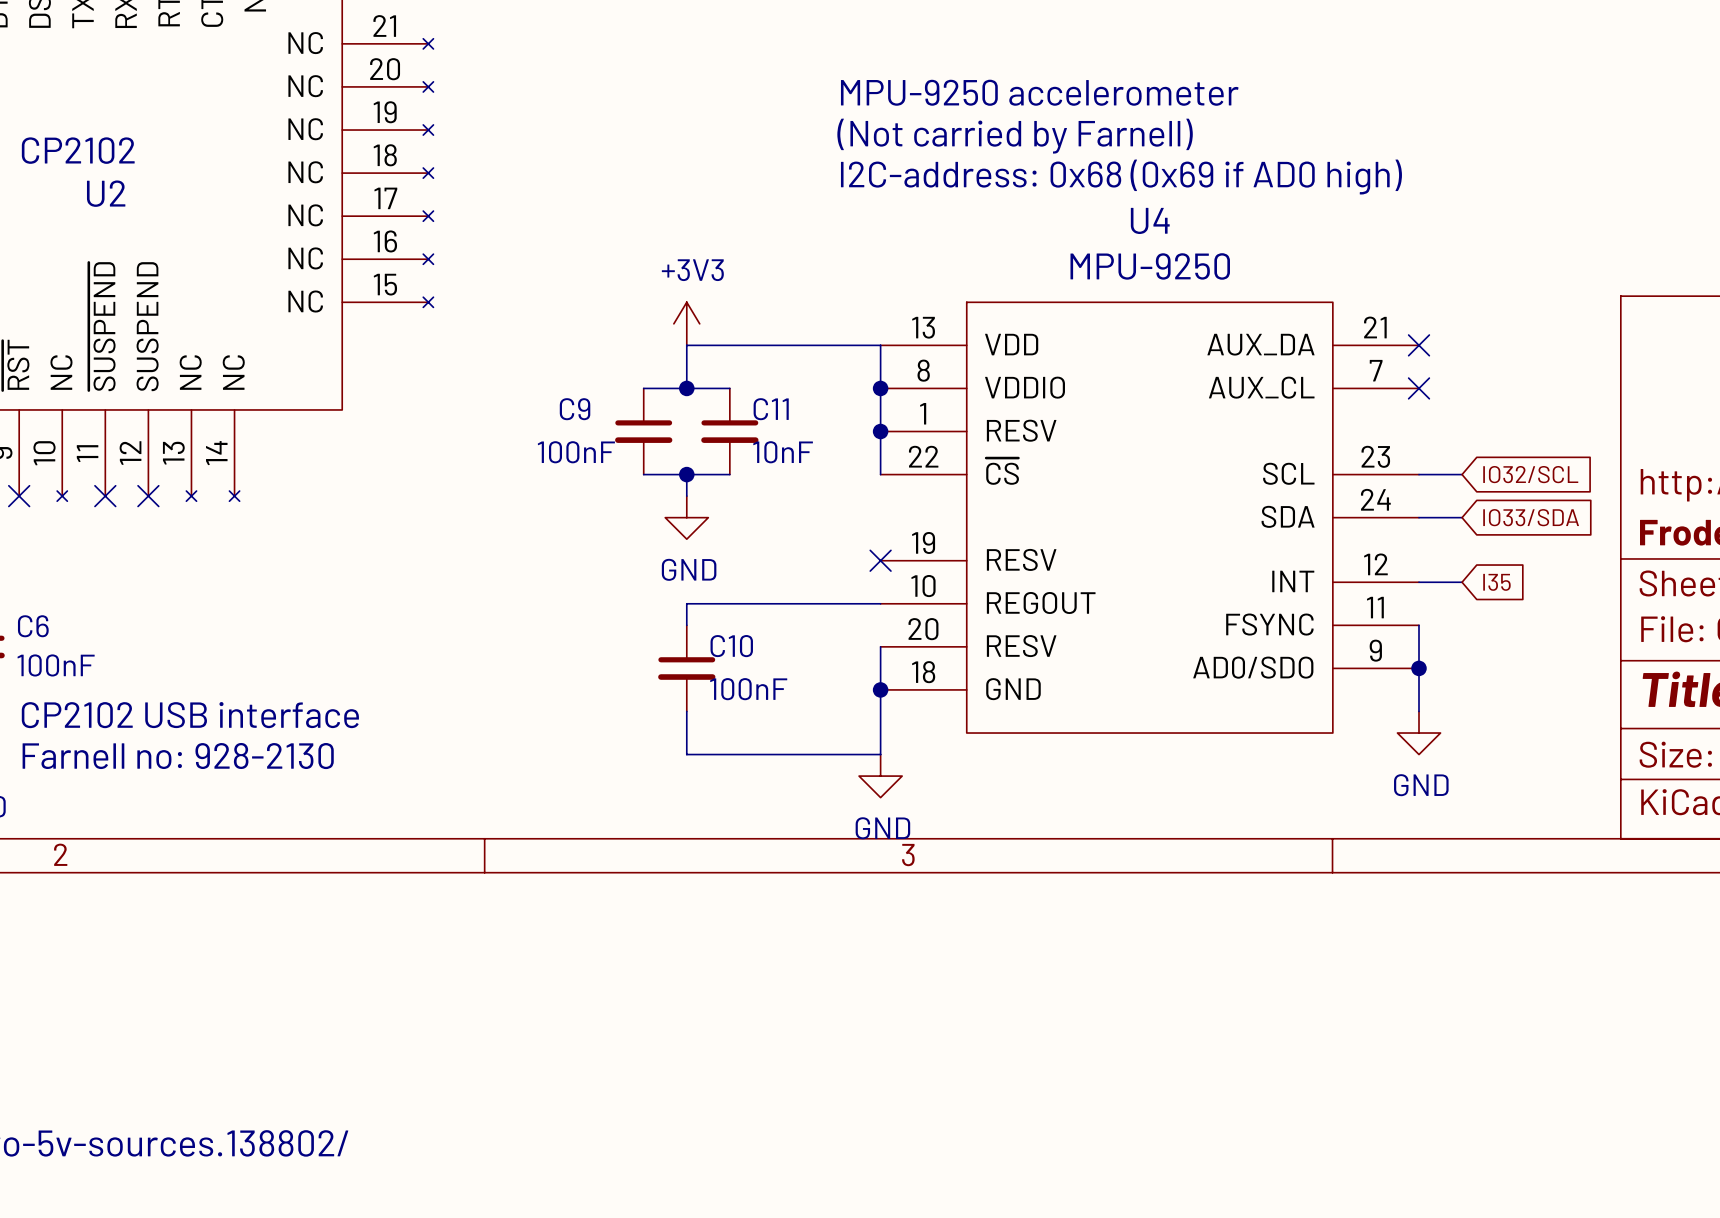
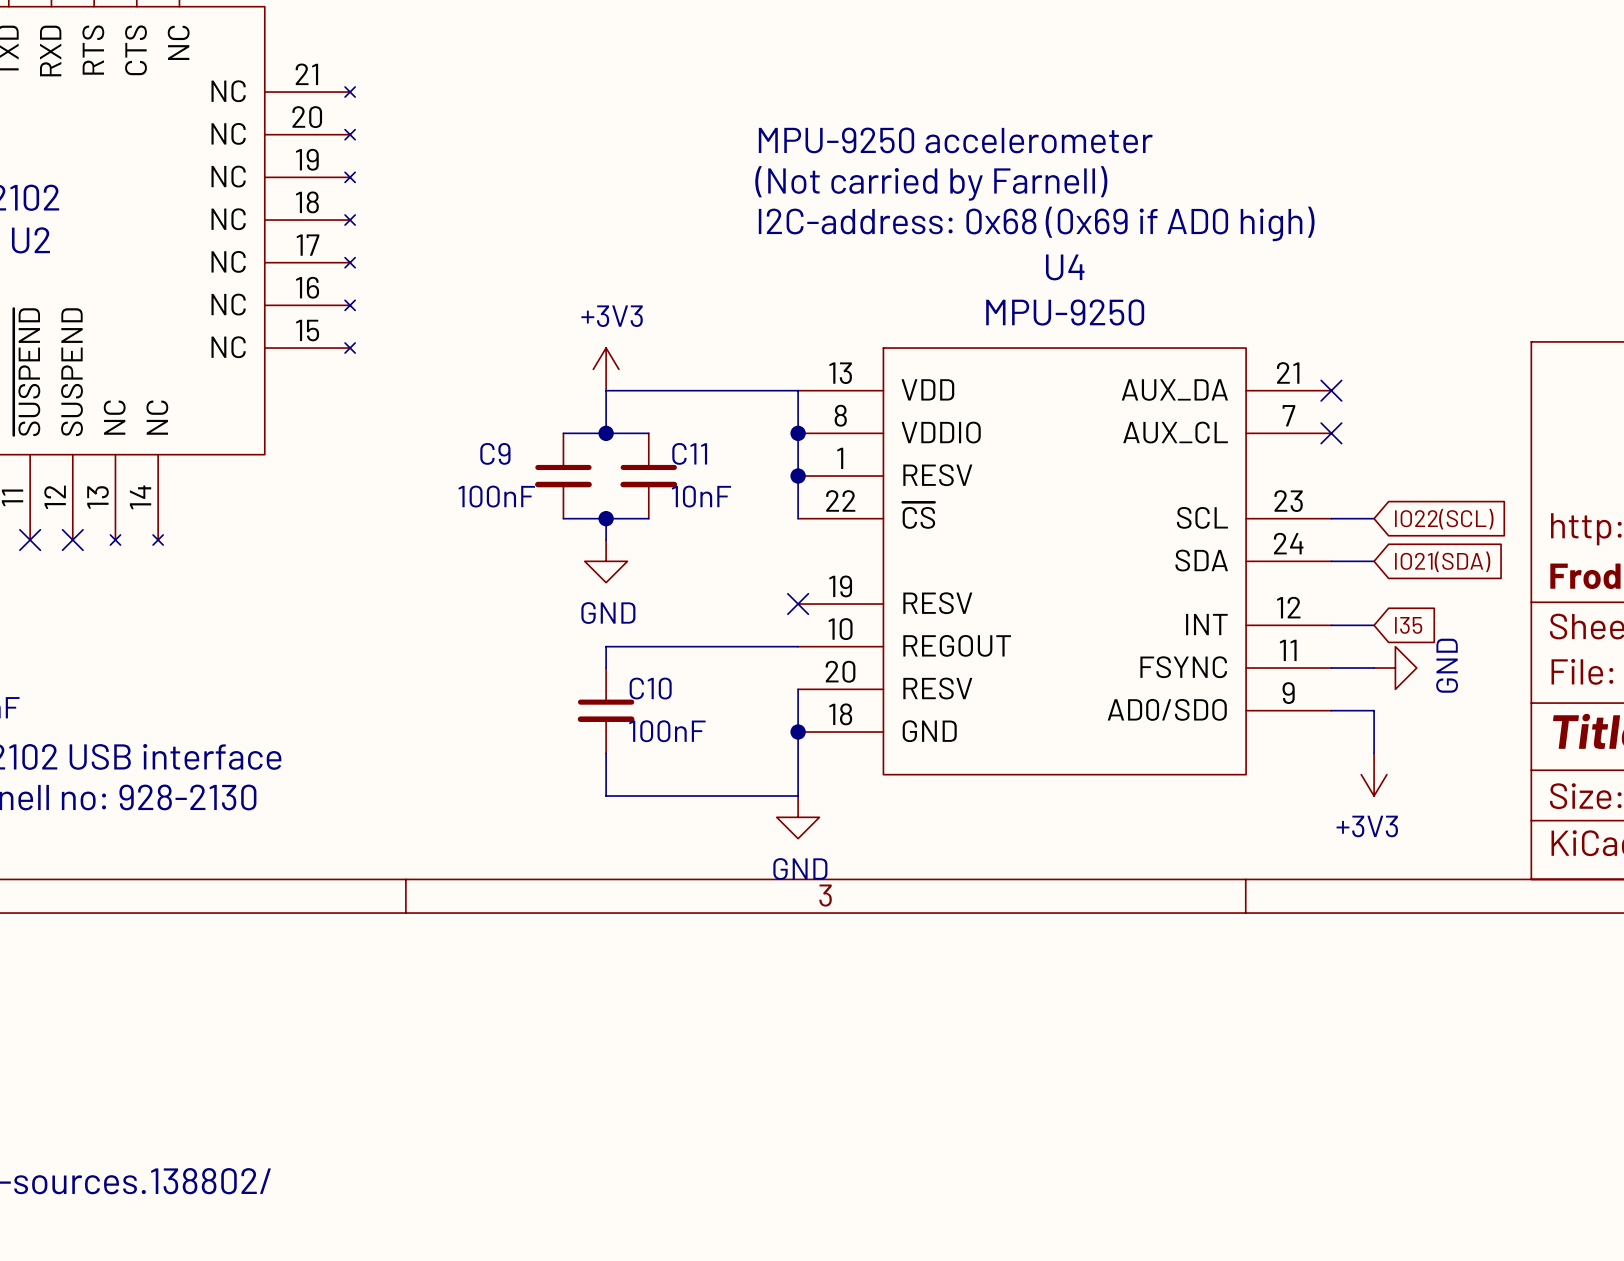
global label: IO32/SCL (1530, 474) -> IO22(SCL) (1444, 519)
global label: IO33/SDA (1531, 517) -> IO21(SDA) (1442, 561)
wire: (1419, 625) (1419, 711) -> (1331, 668) (1374, 668)
wire: none -> (1331, 710) (1374, 710) (1374, 753)
junction: (1419, 668) -> none
power symbol rotation: 0° (1419, 733) -> 90° counterclockwise (1395, 668)
power symbol position: GND (1419, 733) -> GND (1395, 668)
power symbol: none -> +3V3 (1374, 774)

